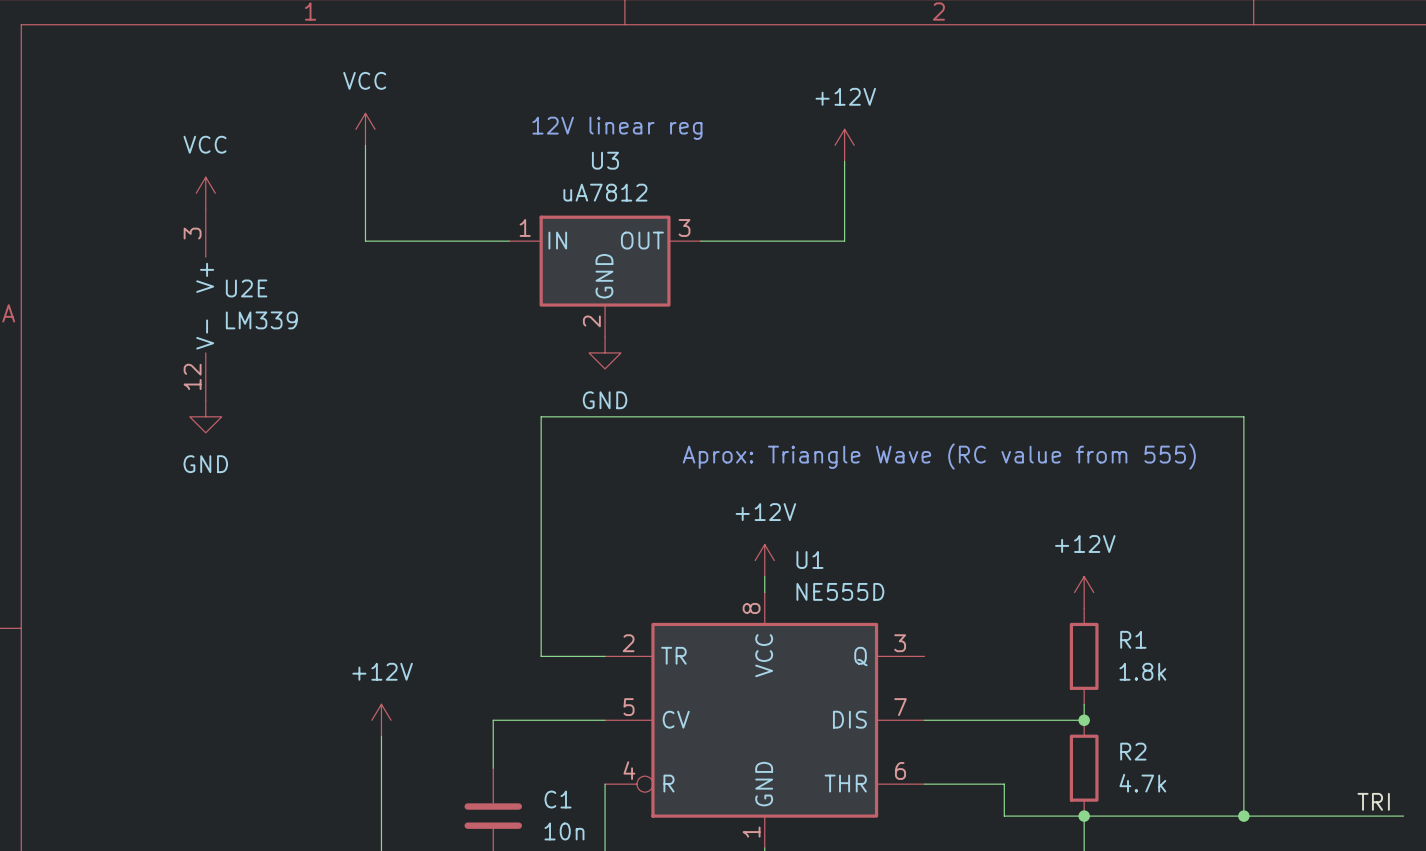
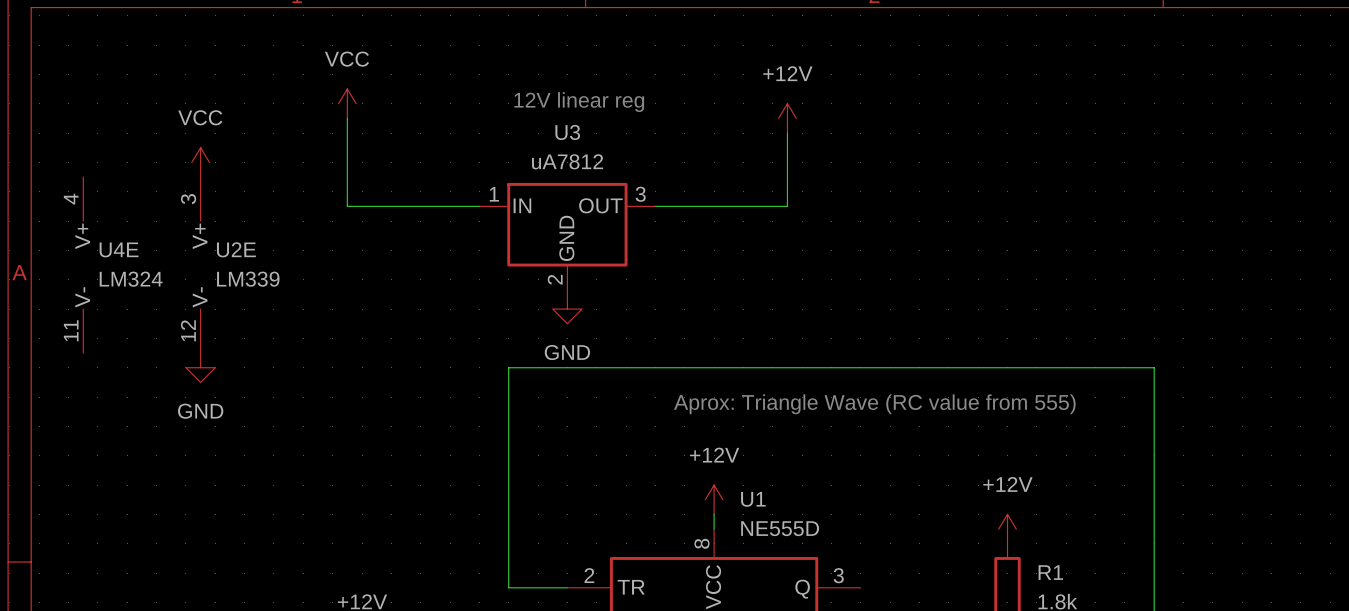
U4E: none -> LM324 (83, 265)

